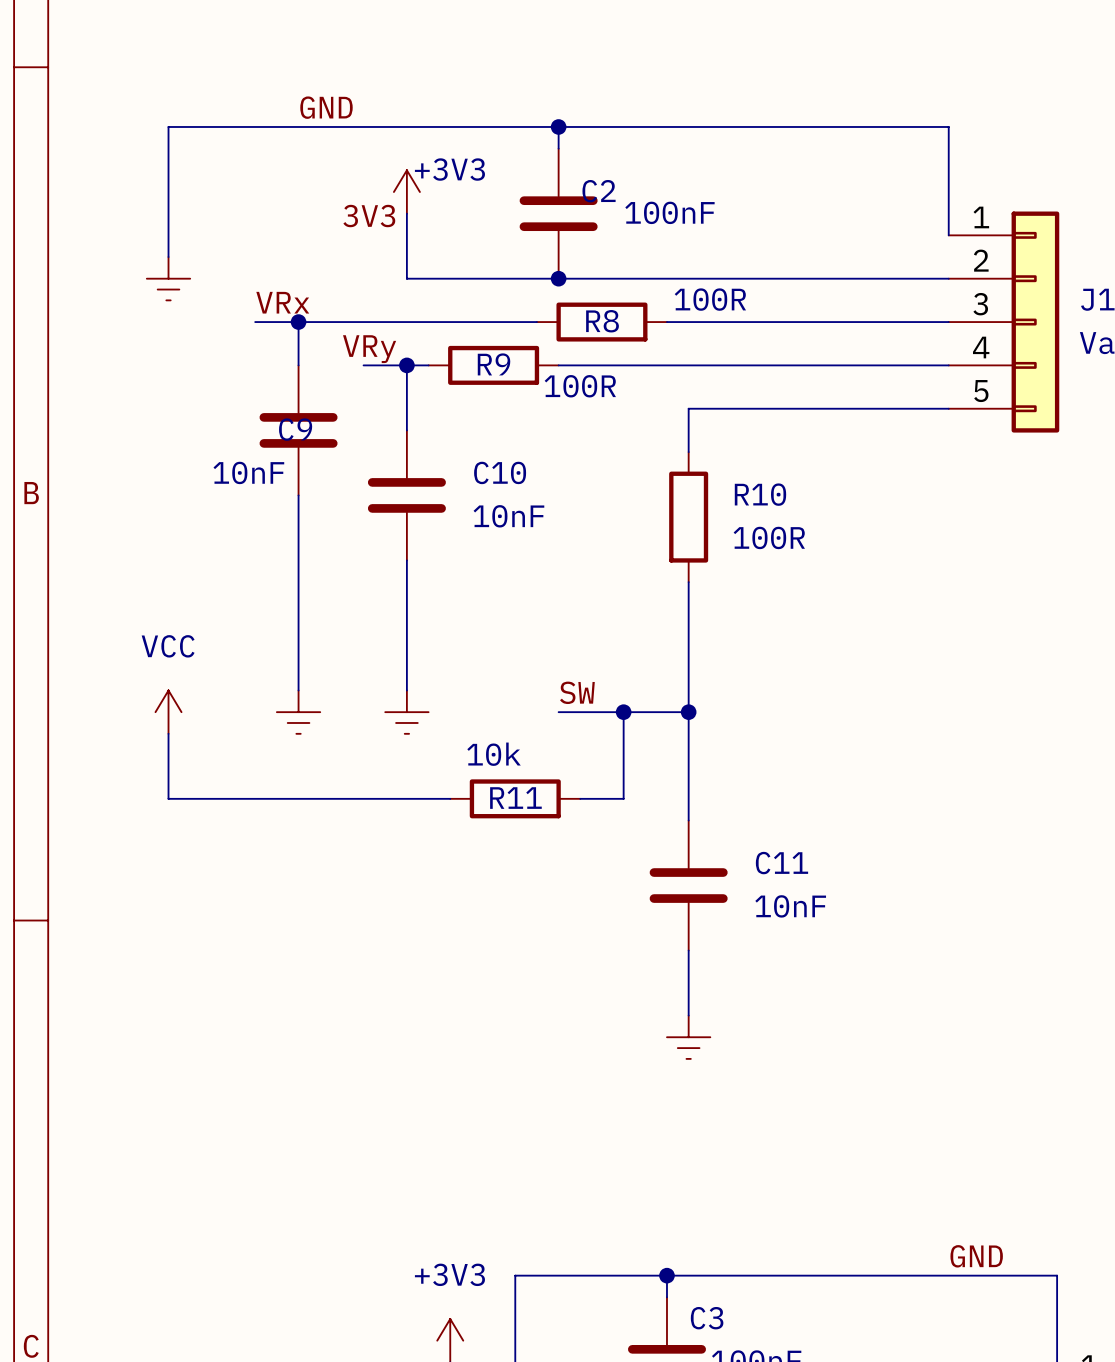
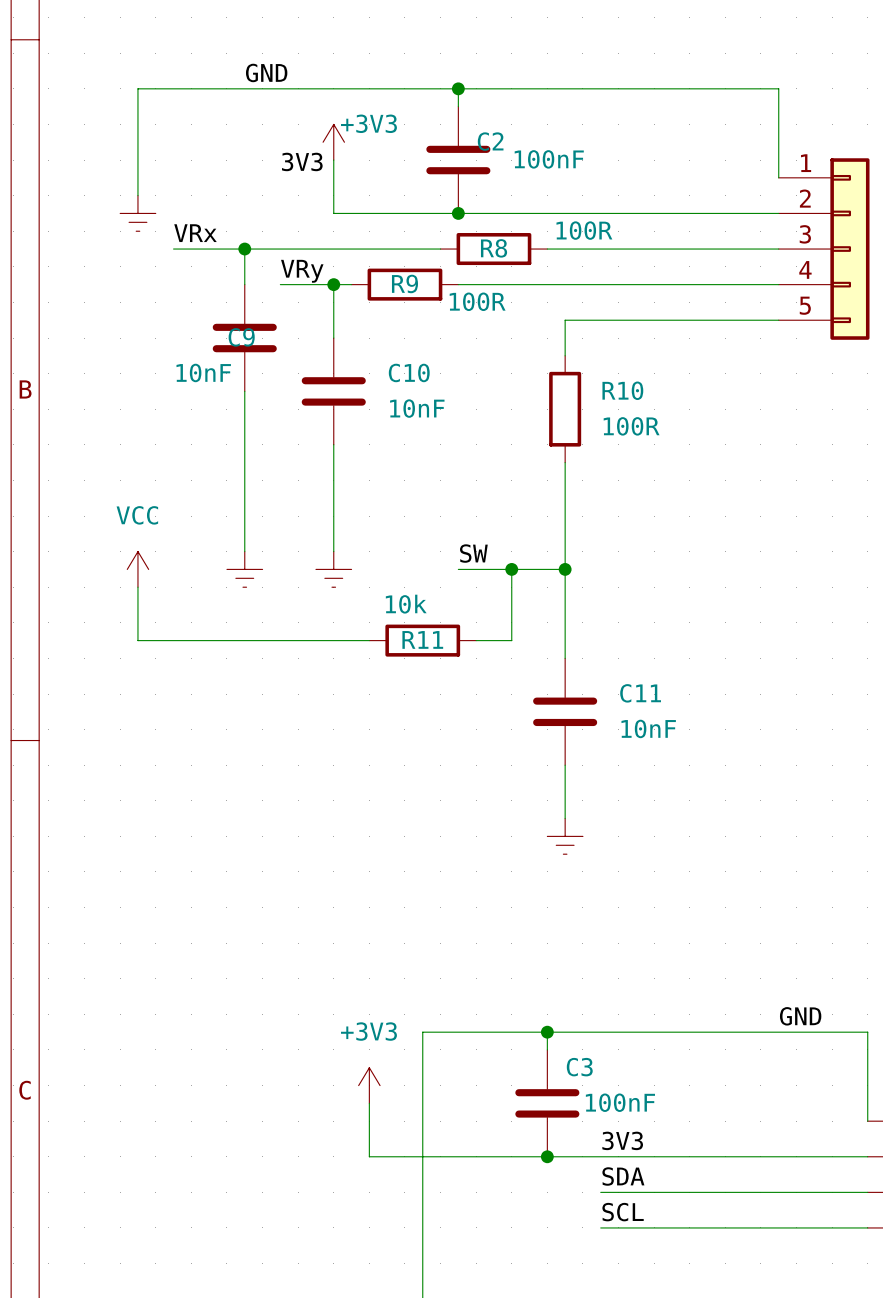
label position: VRx (282, 302) -> VRx (195, 233)
wire: none -> (173, 249) (209, 249)
wire: none -> (280, 284) (298, 284)

